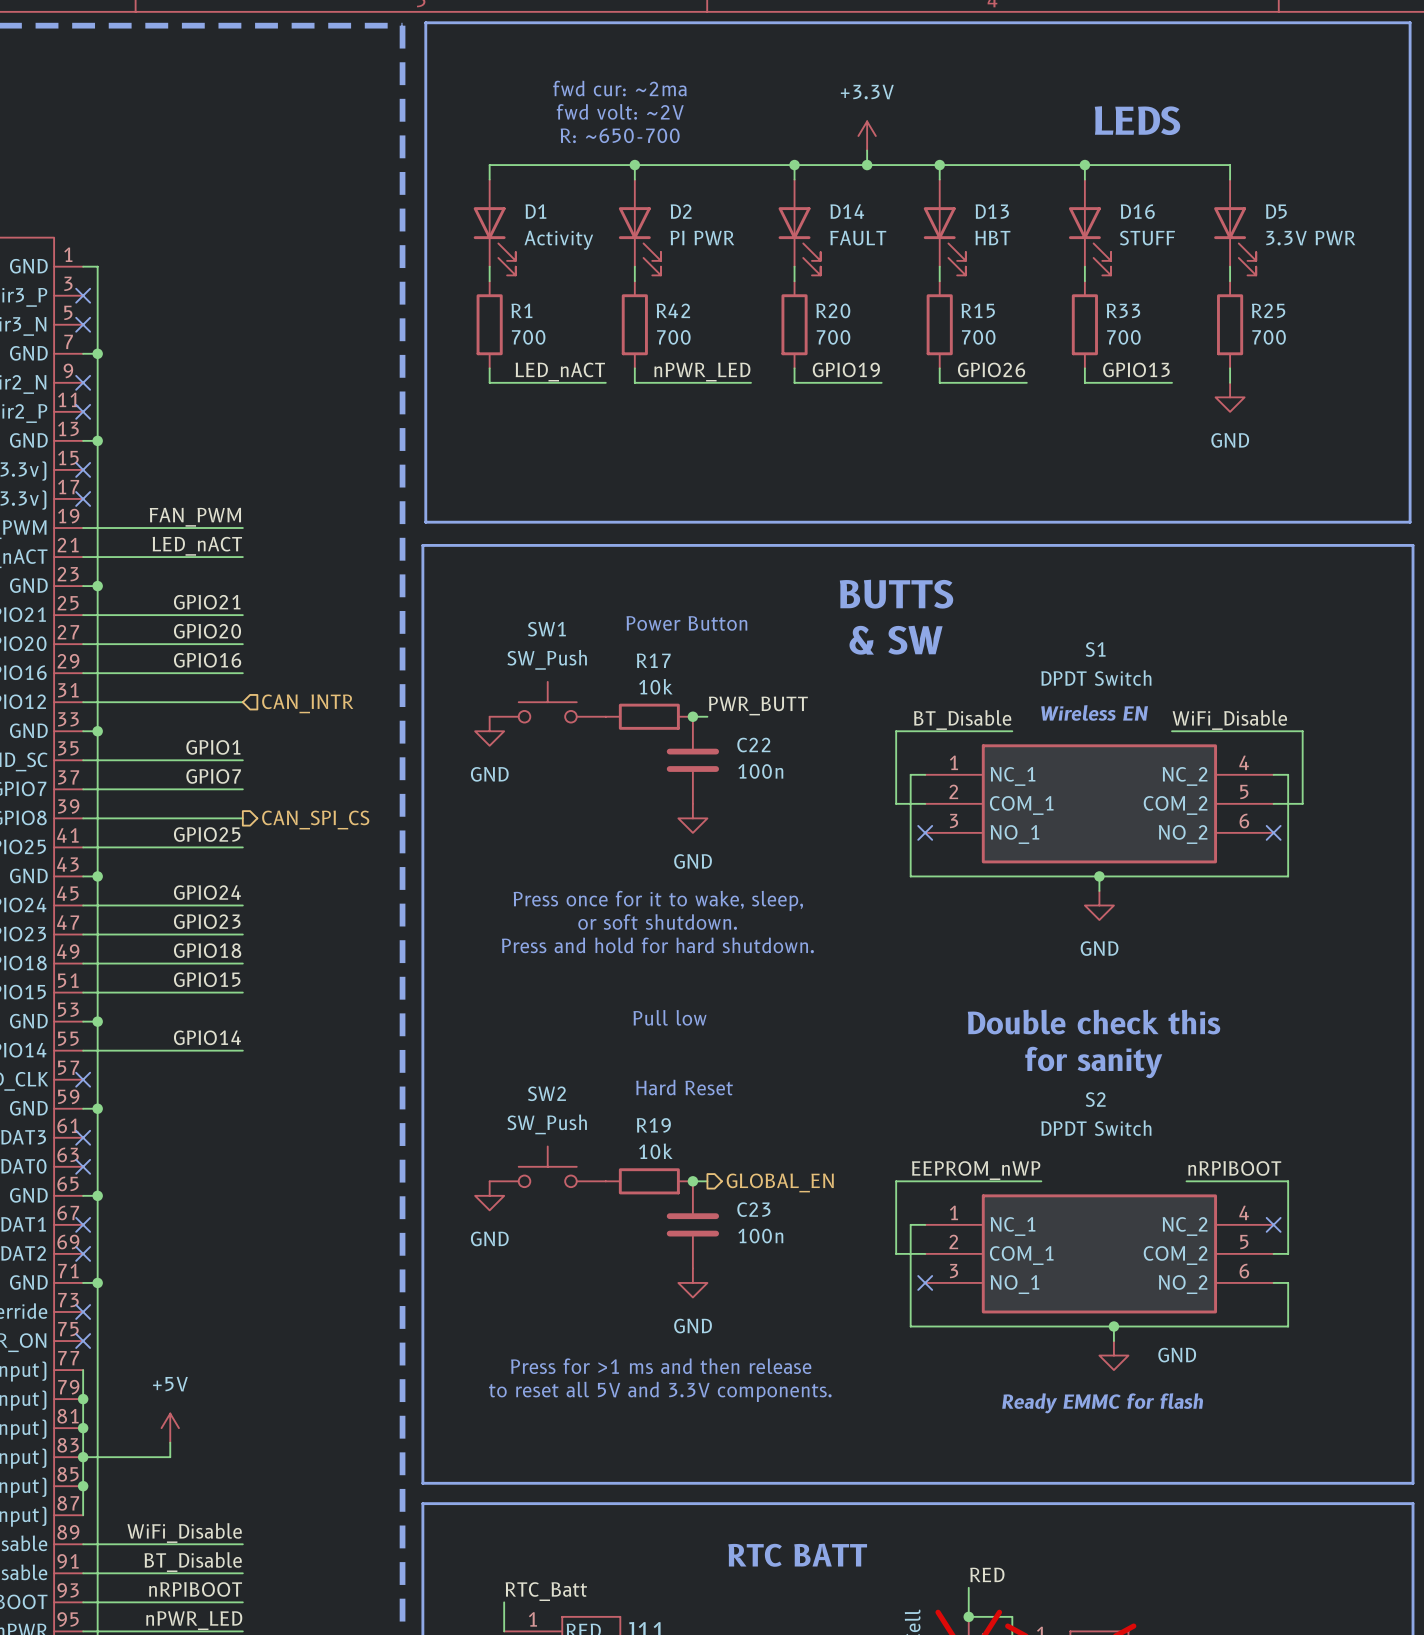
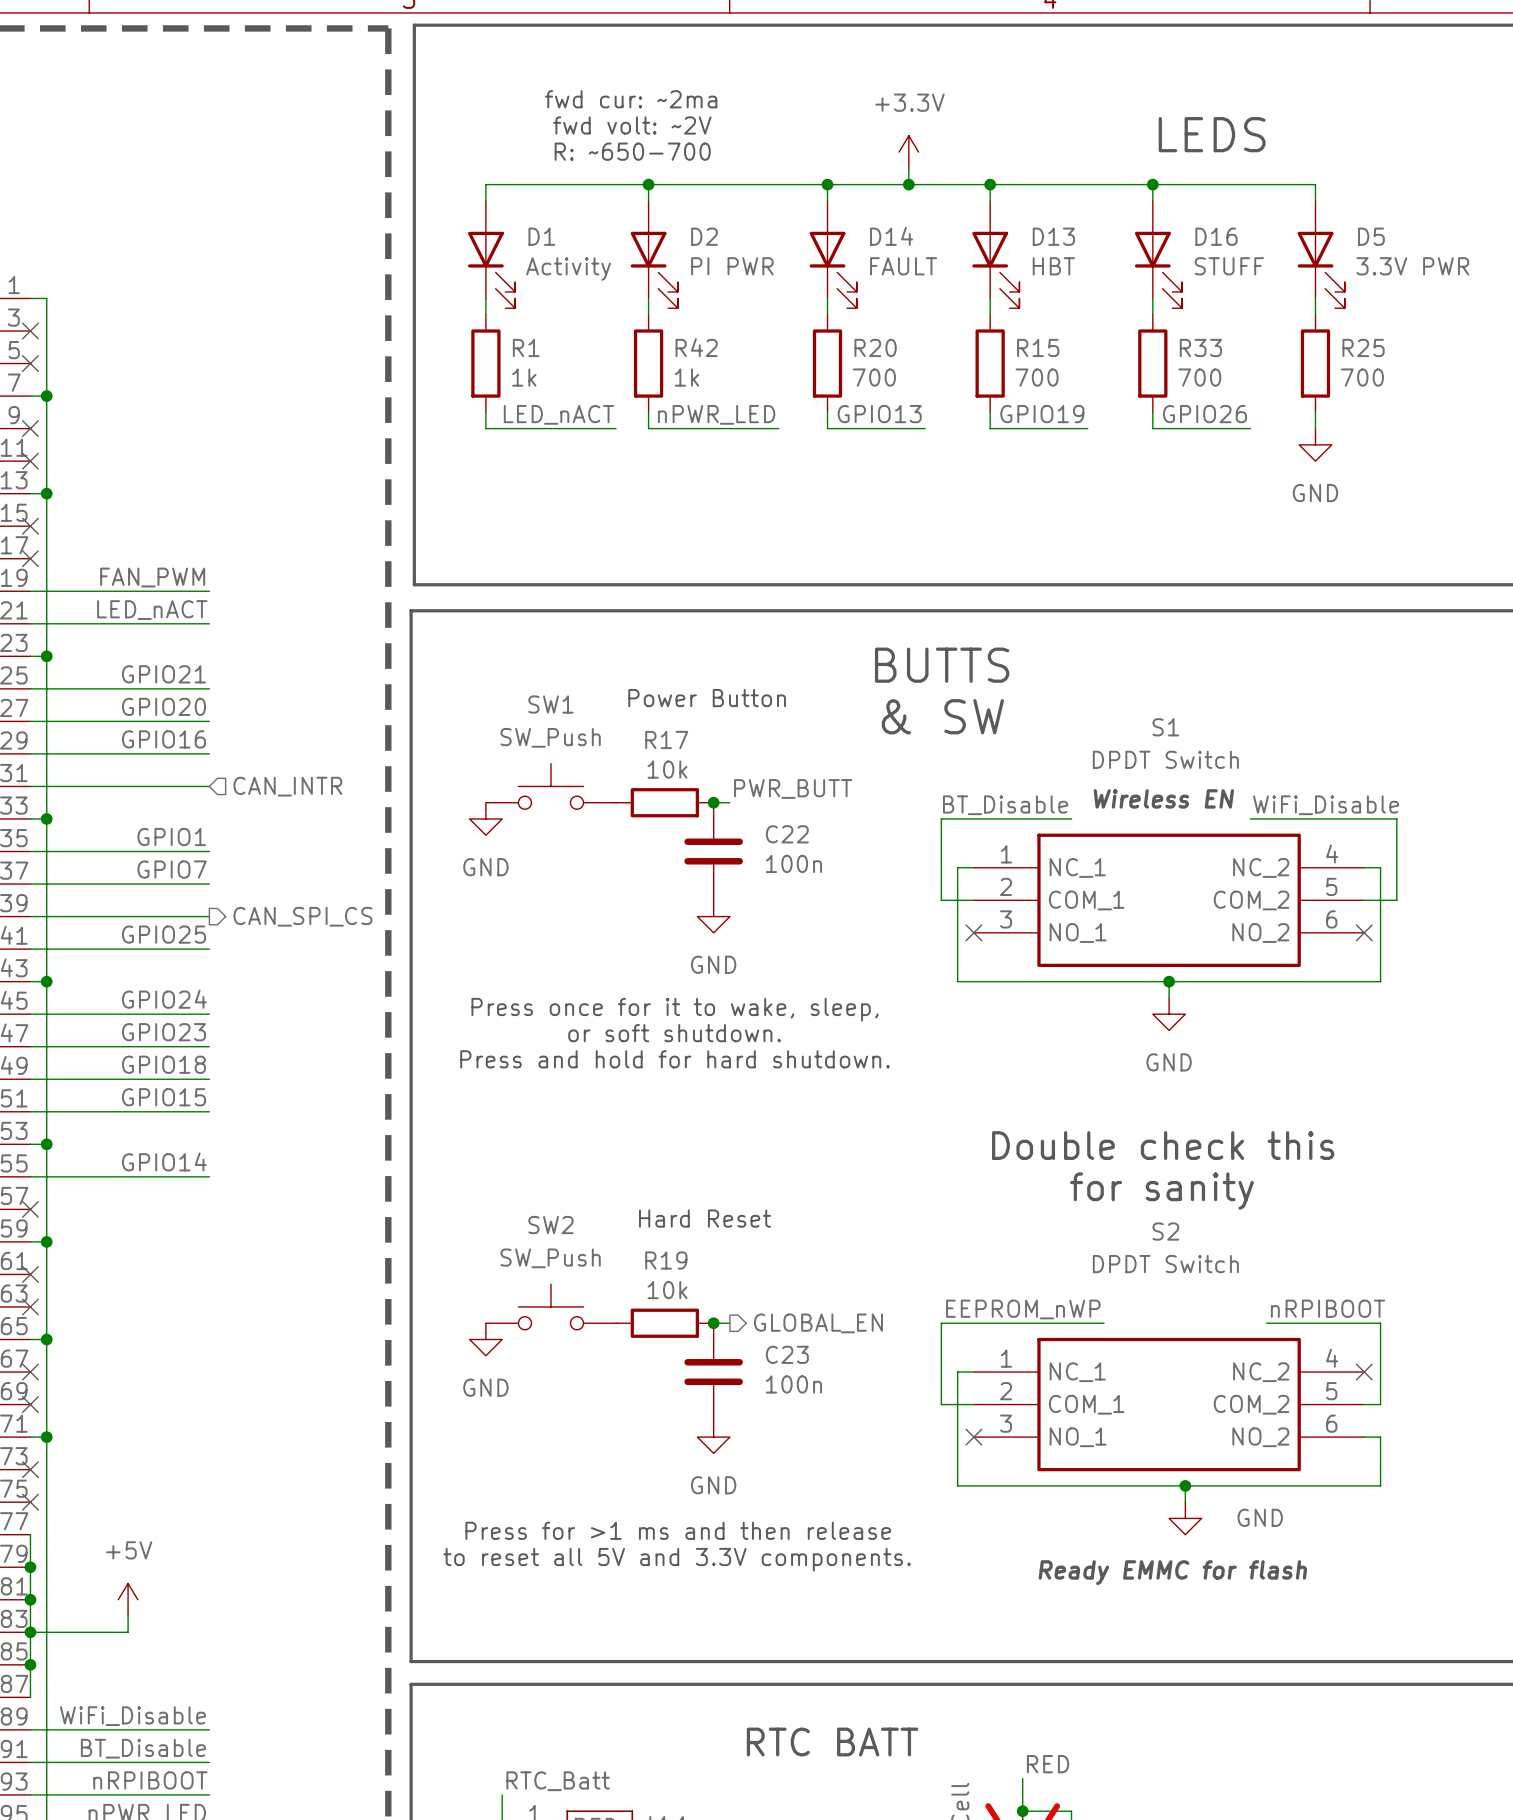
R1 value: 700 (528, 337) -> 1k (524, 377)
R42 value: 700 (673, 337) -> 1k (686, 377)
label: GPIO19 (846, 369) -> GPIO13 (879, 414)
label: GPIO26 (991, 369) -> GPIO19 (1042, 414)
label: GPIO13 (1136, 369) -> GPIO26 (1204, 414)
text: Pull low (670, 1017) -> none

